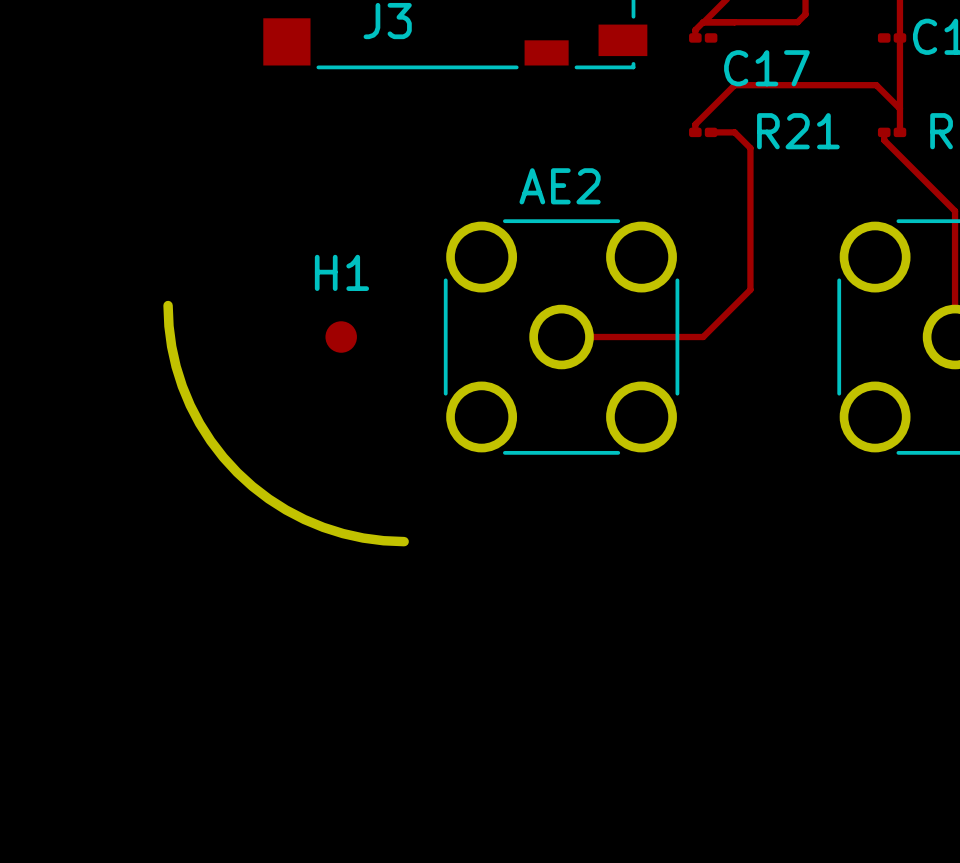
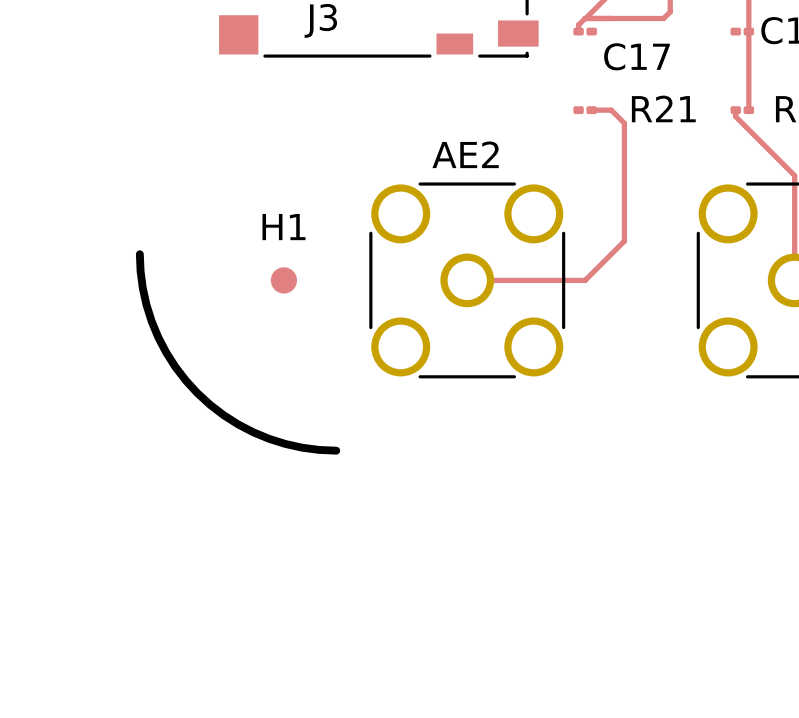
track: (899, 108) (876, 85) (734, 85) (695, 124) (695, 132) -> none

